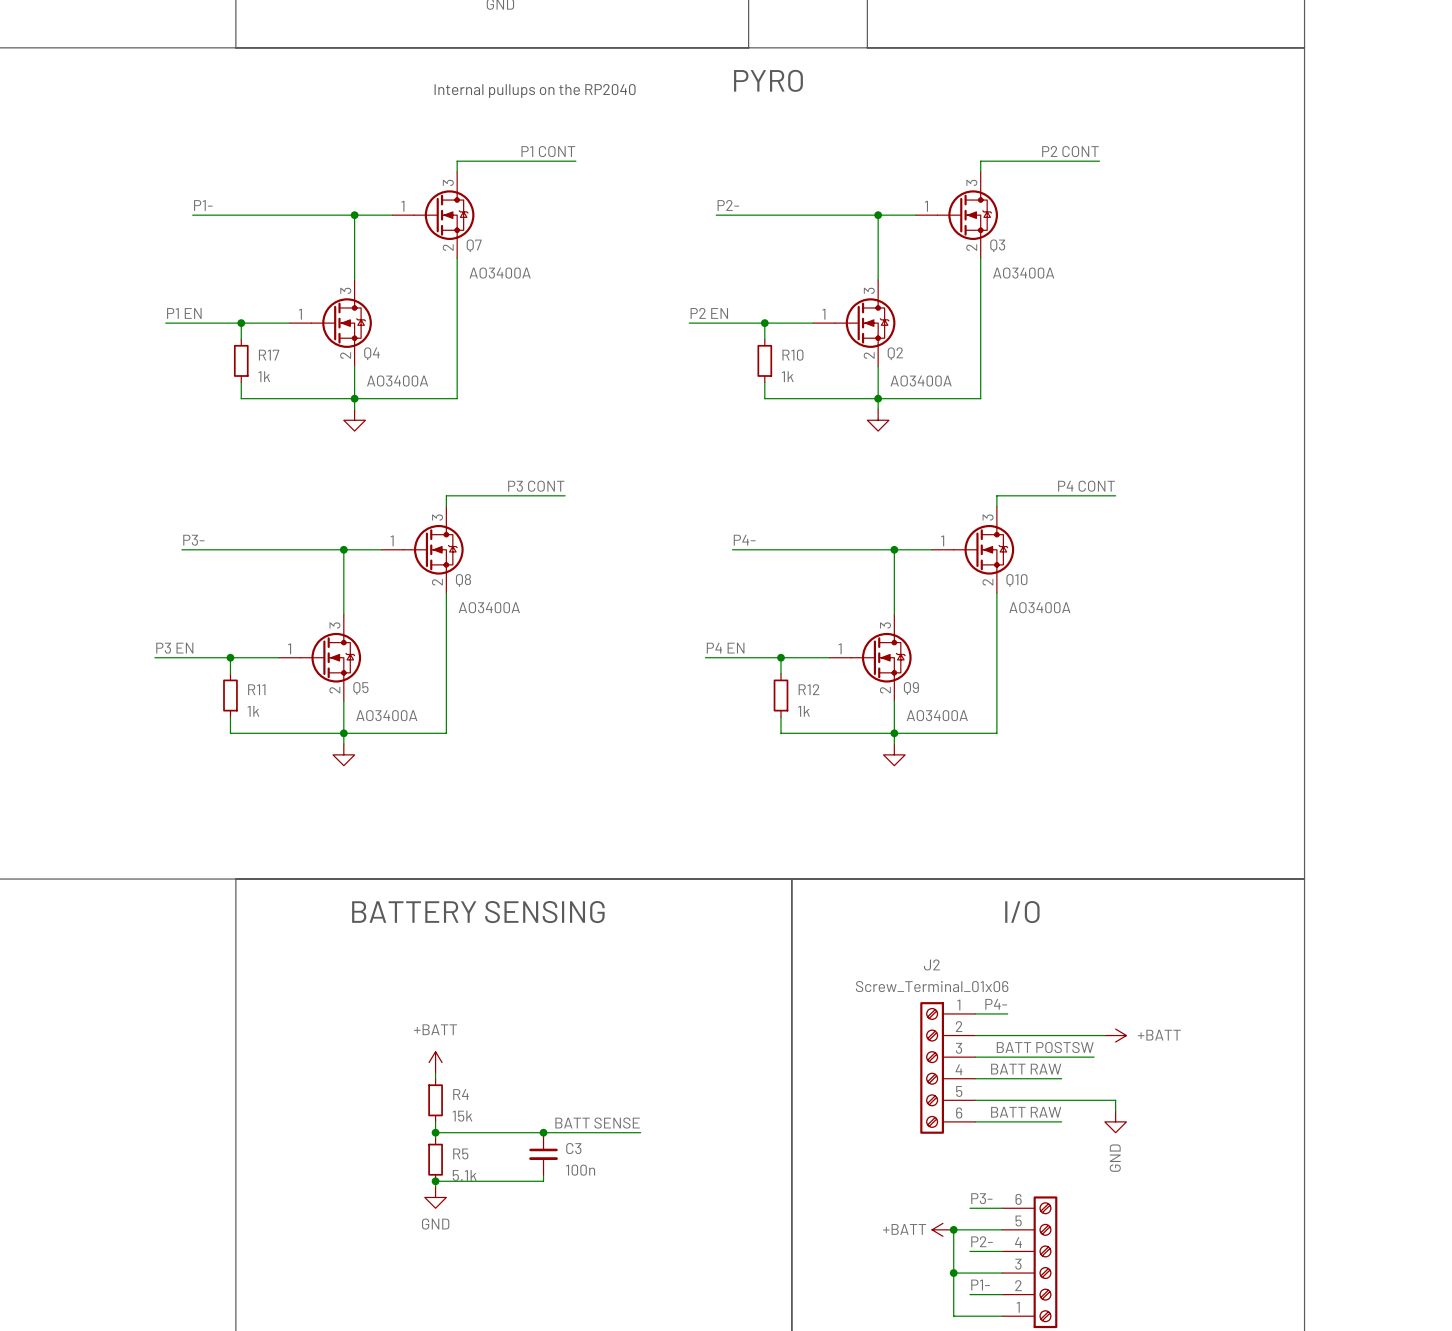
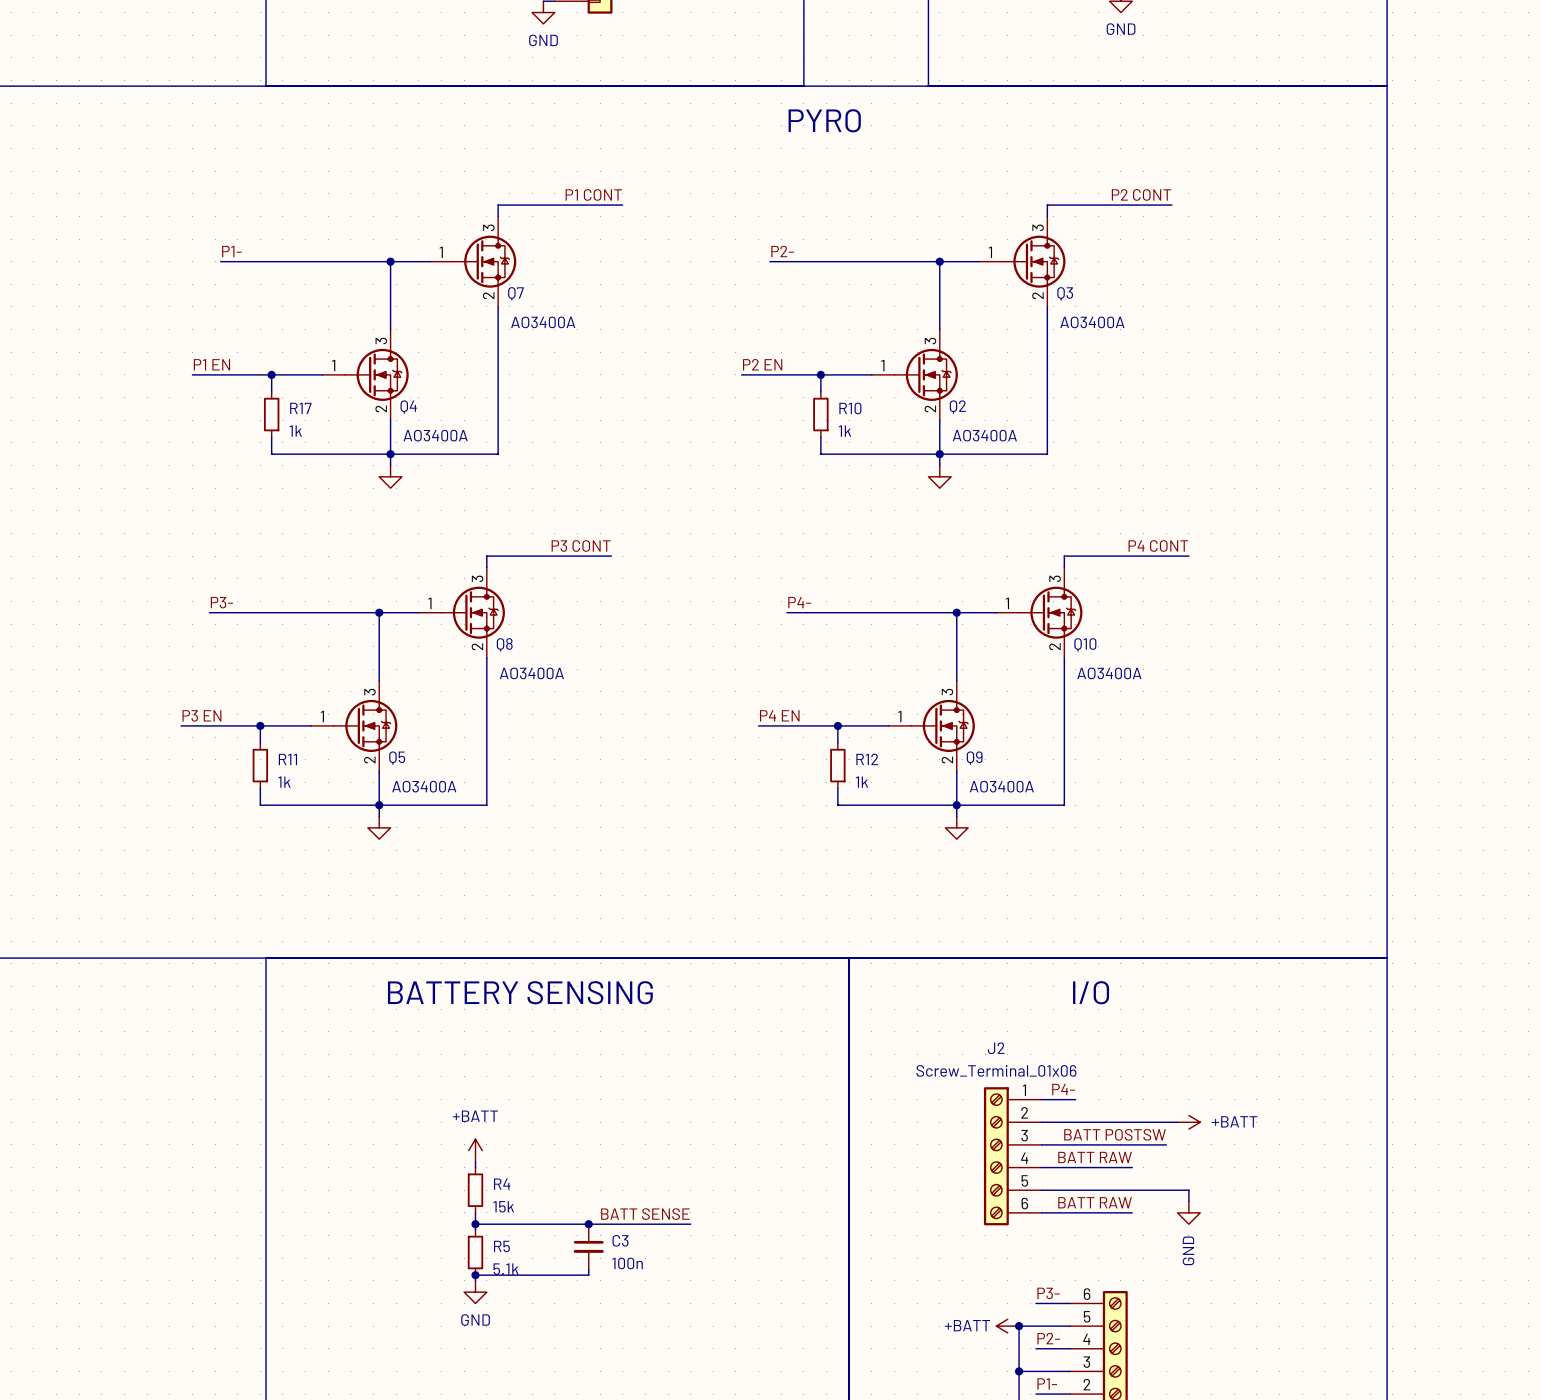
text: Internal pullups on the RP2040 (535, 91) -> none

